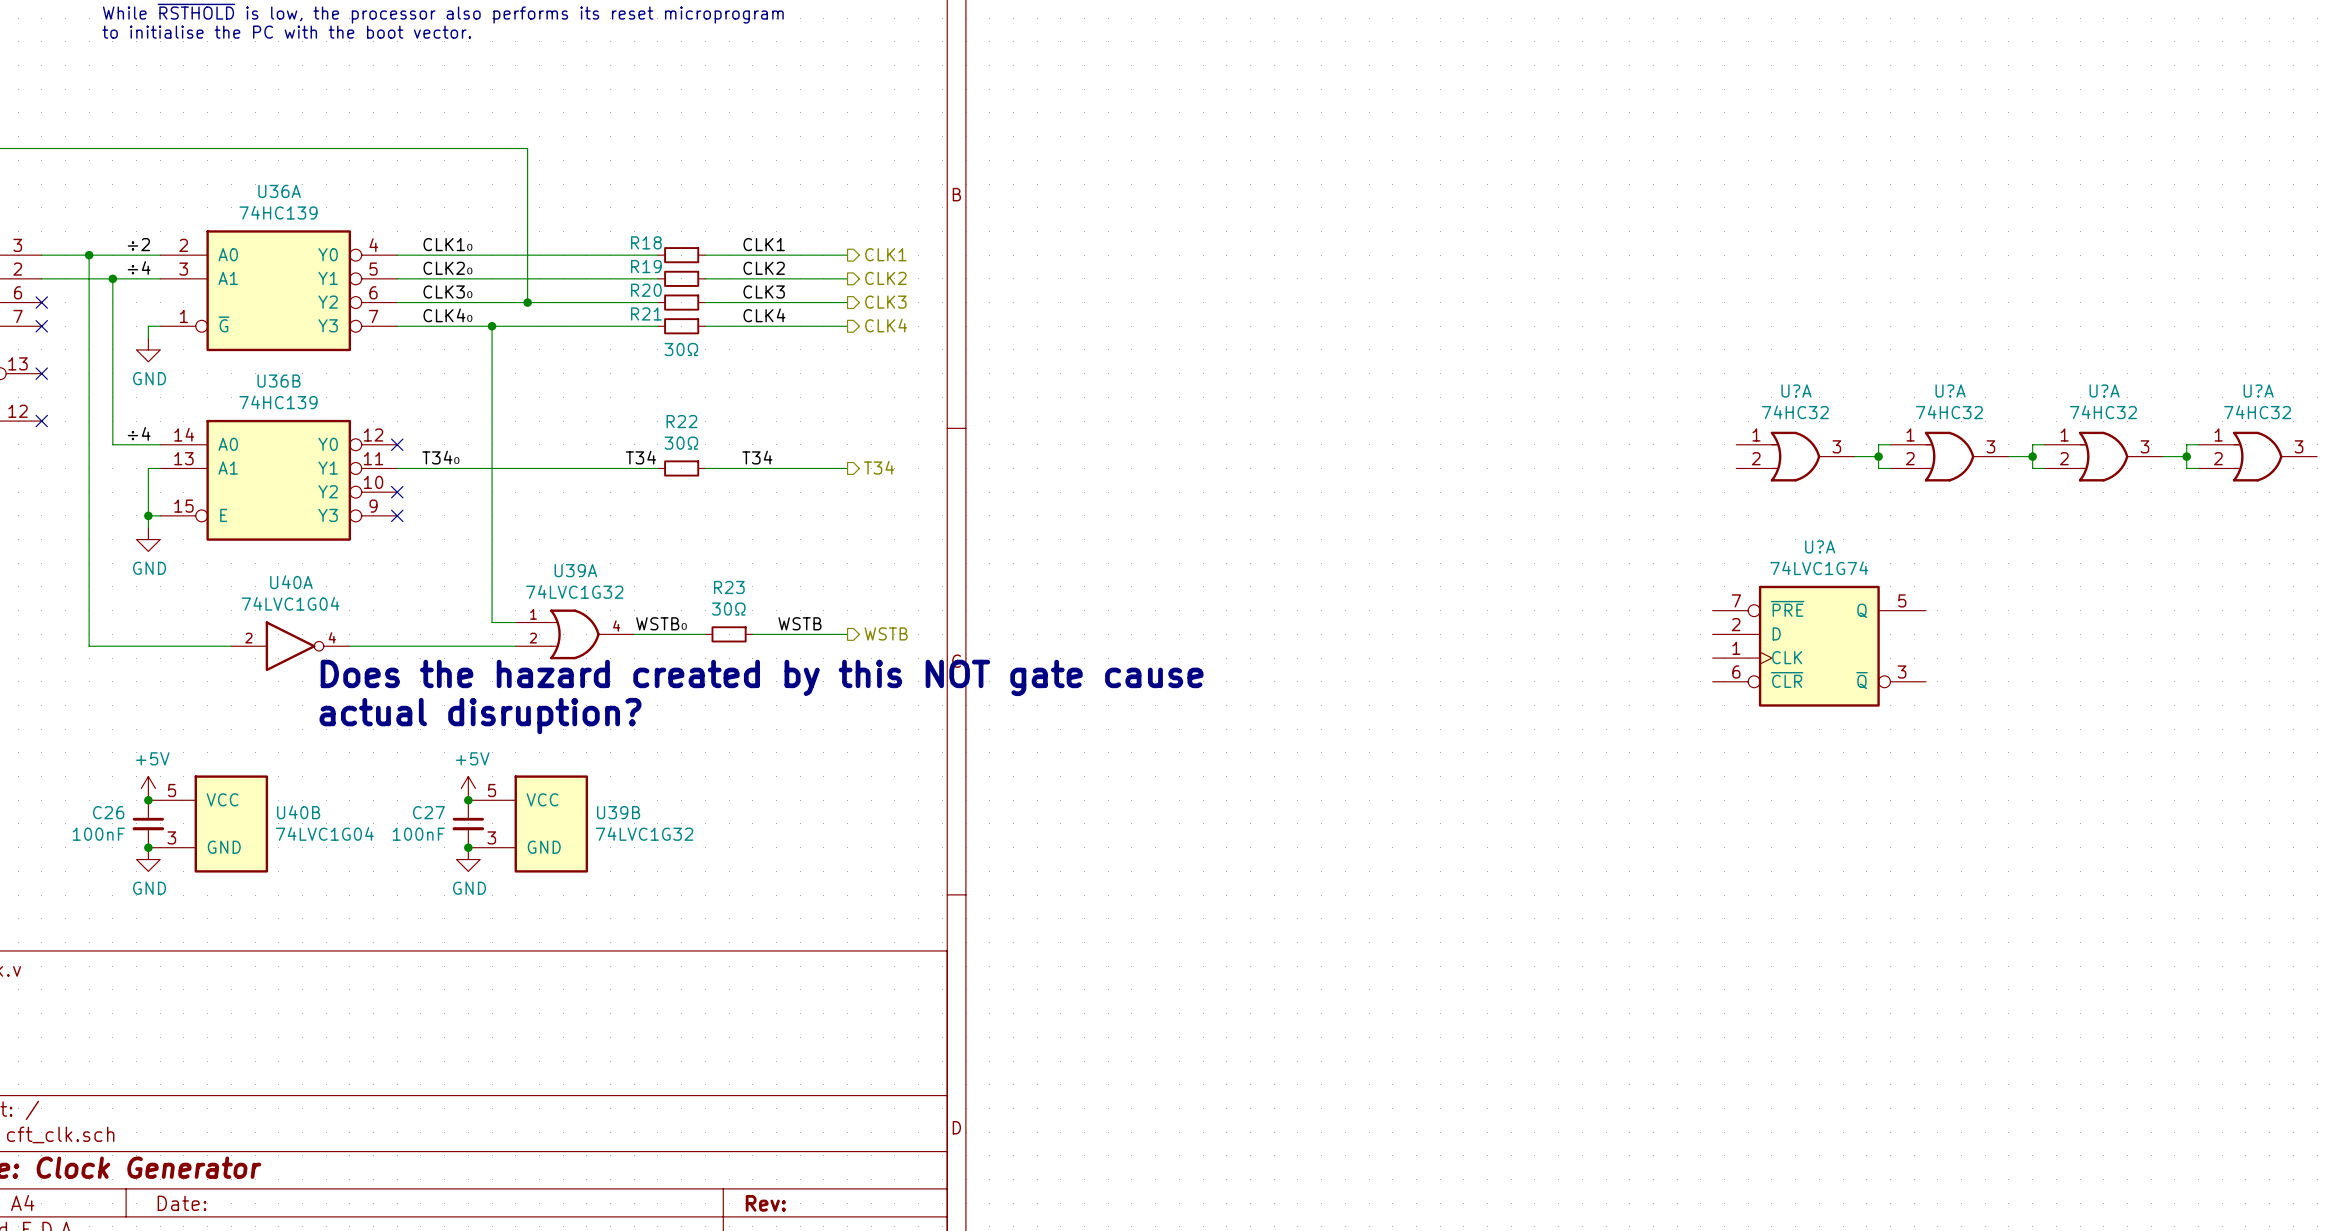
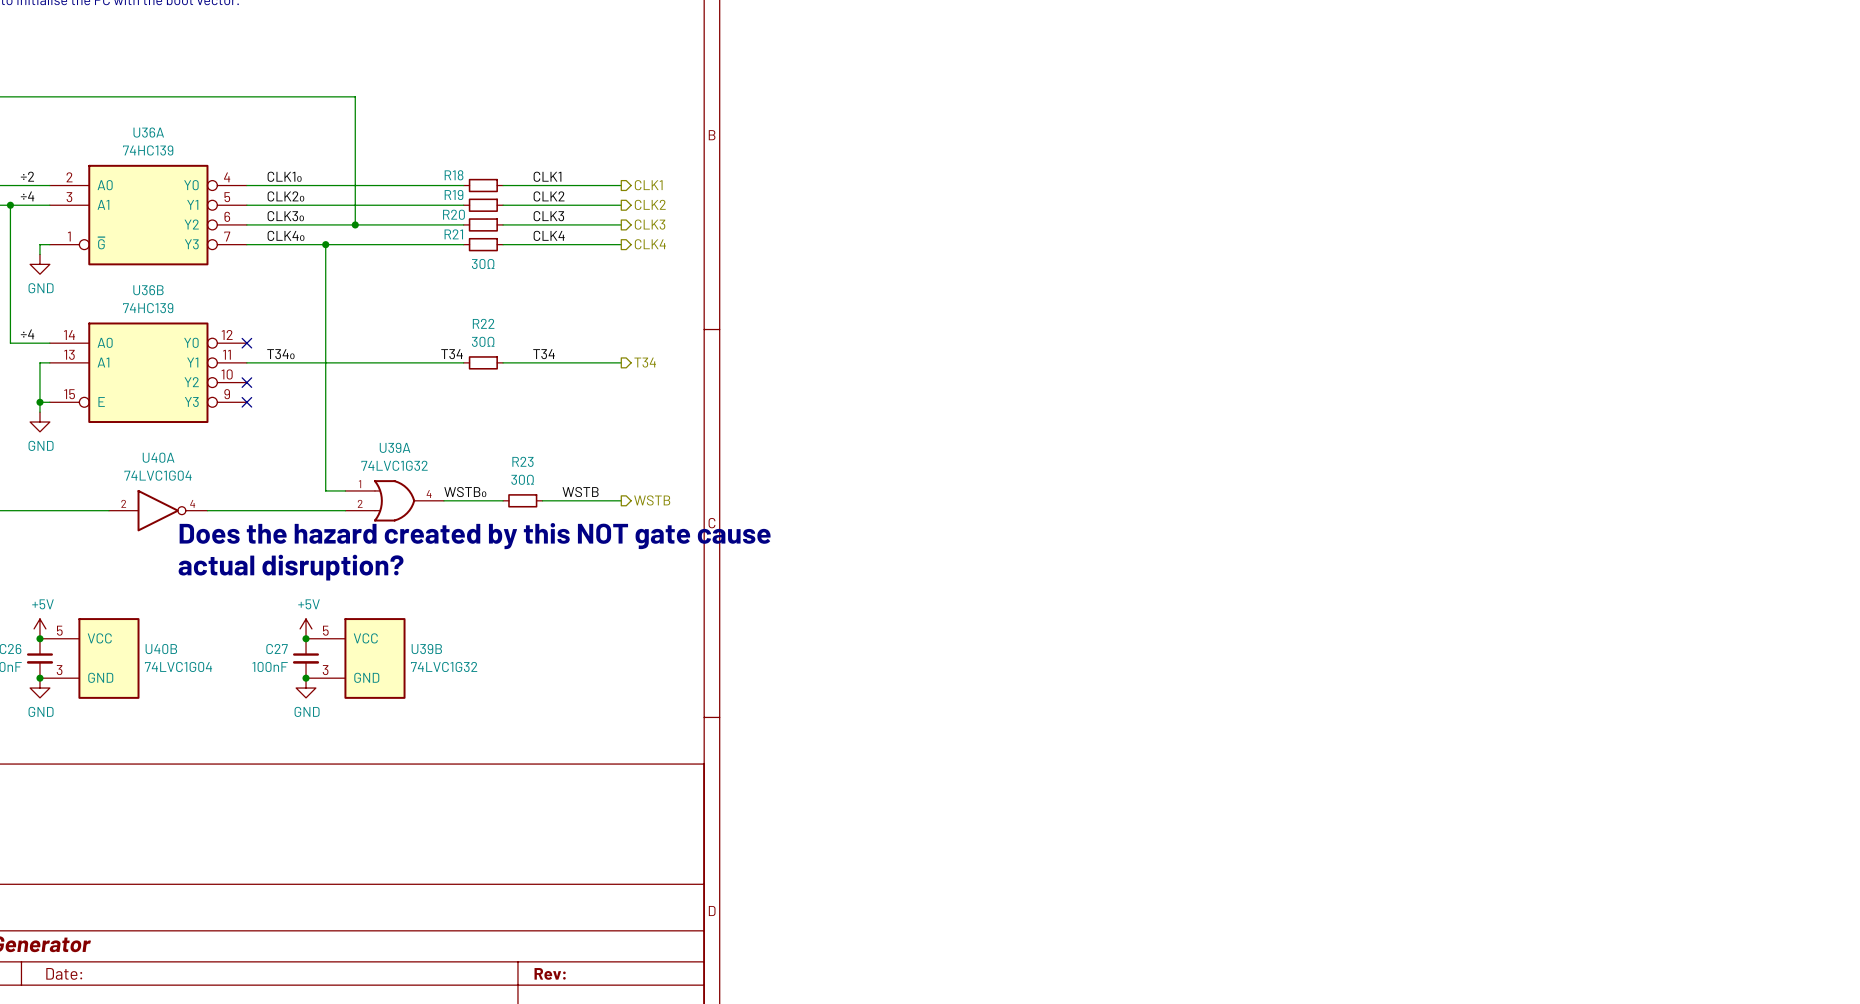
wire: (1890, 444) (1878, 444) (1878, 468) (1890, 468) -> none
wire: (2044, 444) (2032, 444) (2032, 468) (2044, 468) -> none
wire: (2198, 444) (2186, 444) (2186, 468) (2198, 468) -> none
U?A: 74HC32 (1795, 456) -> none
wire: (1854, 456) (1878, 456) -> none
junction: (1878, 456) -> none
U?A: 74HC32 (1949, 456) -> none
wire: (2008, 456) (2032, 456) -> none
junction: (2032, 456) -> none
U?A: 74HC32 (2103, 456) -> none
wire: (2163, 456) (2186, 456) -> none
junction: (2186, 456) -> none
U?A: 74HC32 (2257, 456) -> none
U?A: 74LVC1G74 (1819, 646) -> none

